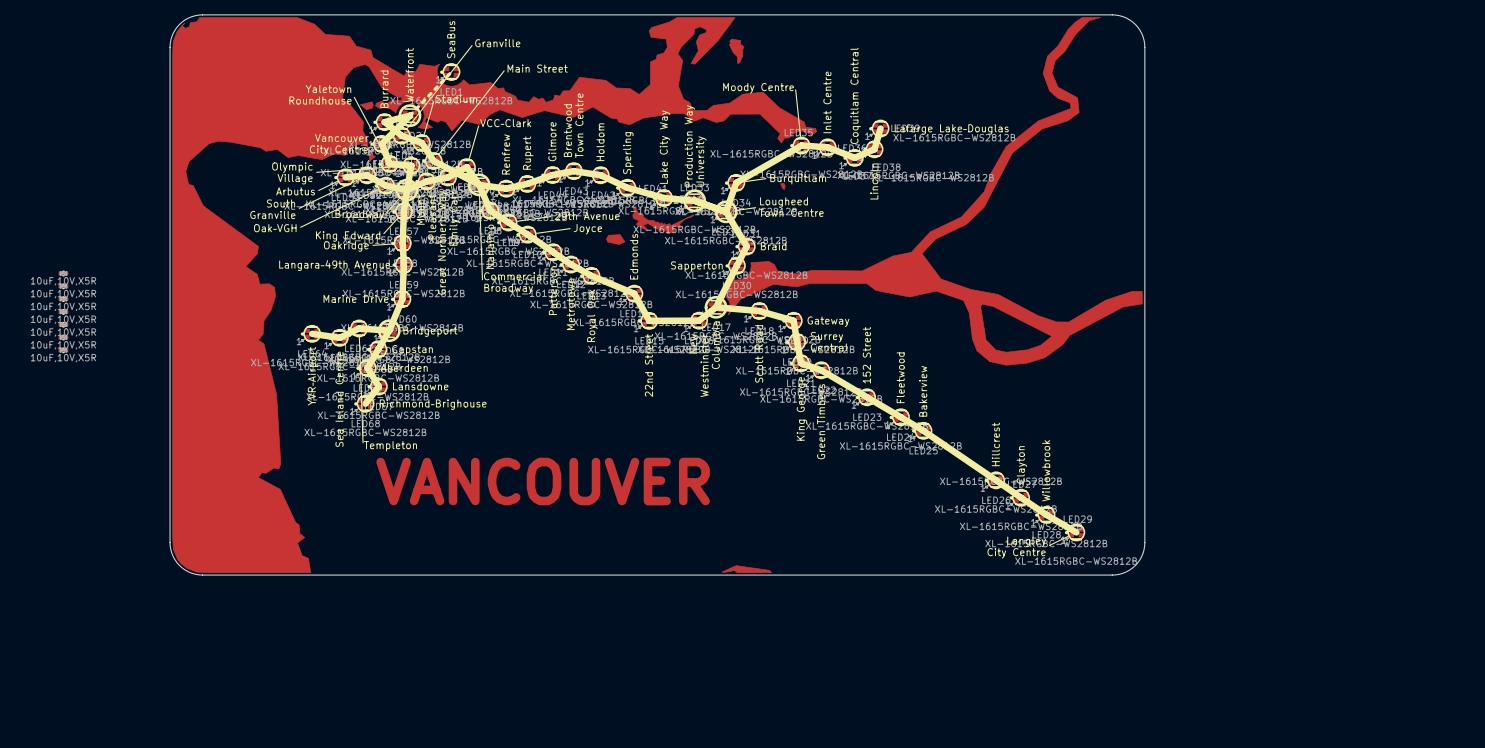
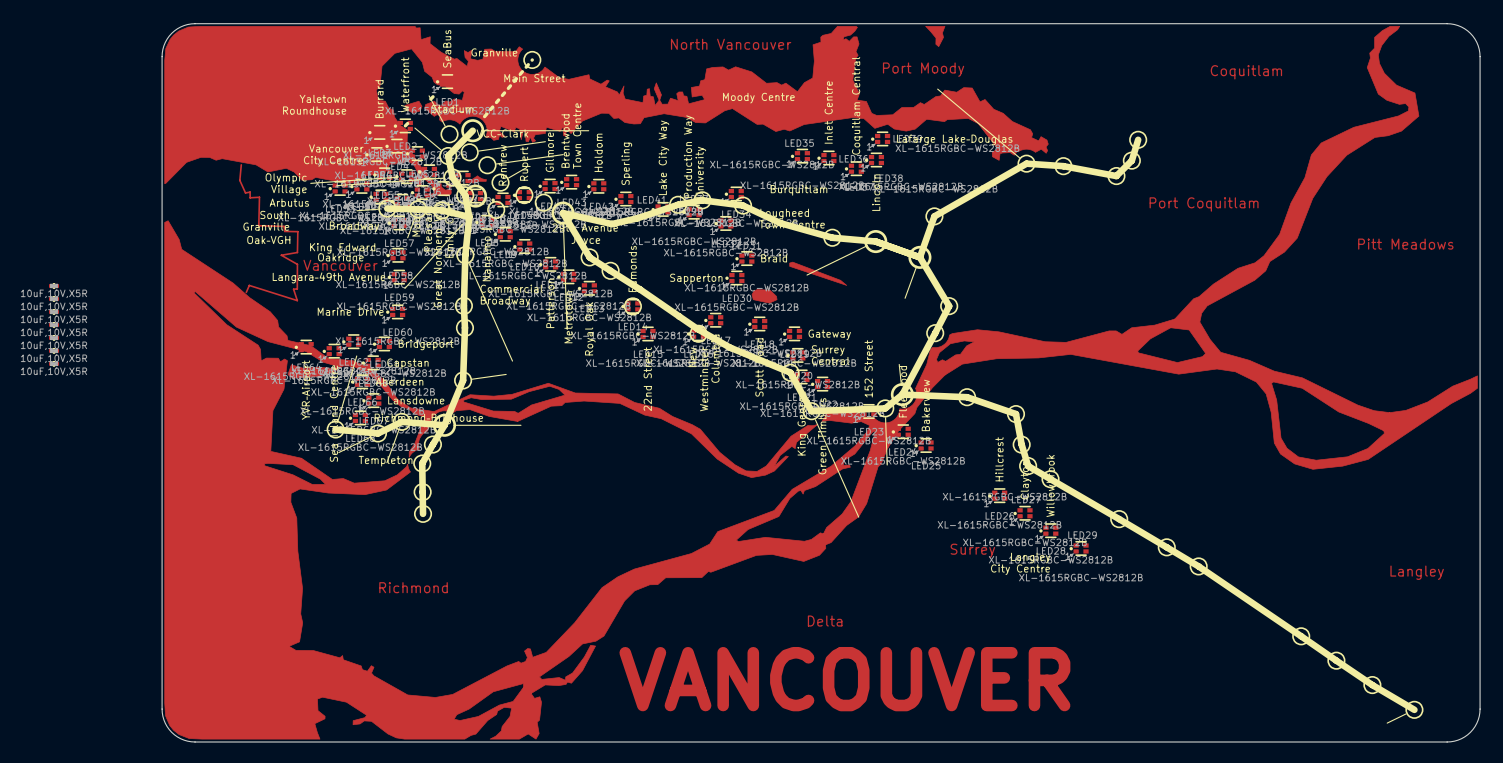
board edge: (1112, 14) (1126, 18) (1135, 24) (1143, 36) (1144, 47) (1144, 542) (1139, 559) (1129, 570) (1112, 575) (202, 575) (191, 573) (179, 565) (173, 556) (170, 542) -> (1117, 23) (1447, 23) (1464, 28) (1476, 42) (1480, 56) (1480, 709) (1476, 723) (1464, 736) (1447, 742) (191, 741) (180, 738) (171, 732) (165, 723) (162, 712) (162, 558)
drawing: [172, 17, 1143, 574] -> none
drawing: none -> [164, 26, 1073, 225]
text: none -> North Vancouver (731, 44)
line: (472, 45) (407, 128) -> none
line: none -> (532, 59) (532, 60)
line: none -> (528, 64) (526, 67)
text: none -> Port Moody (923, 69)
line: none -> (522, 71) (520, 74)
text: none -> Coquitlam (1246, 72)
line: none -> (516, 78) (514, 81)
line: (504, 70) (439, 153) -> none
line: (449, 73) (447, 76) -> none
line: none -> (510, 85) (508, 88)
line: none -> (937, 89) (1019, 157)
line: (443, 80) (441, 82) -> none
line: none -> (504, 92) (502, 95)
line: none -> (429, 95) (445, 126)
line: (795, 89) (800, 136) -> none
line: none -> (498, 99) (496, 102)
line: (430, 93) (428, 95) -> none
line: (354, 97) (385, 155) -> none
line: none -> (492, 107) (490, 109)
line: (424, 100) (422, 102) -> none
line: (433, 101) (424, 134) -> none
line: none -> (486, 114) (484, 116)
line: (418, 106) (416, 109) -> none
line: none -> (414, 128) (441, 150)
line: none -> (472, 130) (448, 156) (452, 177) (465, 195) (469, 216)
line: none -> (481, 130) (588, 130)
drawing: none -> [1107, 130, 1148, 186]
line: (478, 125) (469, 158) -> none
line: (880, 128) (874, 149) (854, 157) (827, 147) (801, 145) (736, 182) (726, 211) -> none
line: none -> (1138, 139) (1131, 160) (1116, 176) (1063, 166) (1026, 163) (934, 216) (919, 257)
line: none -> (545, 141) (478, 151)
line: none -> (563, 154) (496, 163)
track: none -> (241, 164) (239, 180) (245, 192) (250, 192) (250, 197) (259, 197) (258, 225) (284, 226) (284, 231) (297, 231) (297, 252) (281, 255) (297, 264) (297, 288) (293, 289) (297, 300) (249, 285) (246, 292)
line: none -> (526, 167) (508, 178)
line: none -> (443, 178) (336, 185)
line: (345, 177) (367, 175) (385, 185) (407, 190) -> none
line: (765, 178) (745, 181) -> none
line: (358, 179) (299, 208) -> none
line: (337, 181) (318, 190) -> none
drawing position: (736, 182) -> (743, 205)
line: (479, 184) (433, 161) (421, 142) (401, 135) (384, 122) (409, 115) (381, 143) (389, 163) (411, 165) (407, 190) -> none
line: (479, 184) (490, 210) (571, 264) (591, 275) (634, 293) (649, 320) (699, 320) (716, 307) -> none
line: (479, 184) (466, 167) (447, 177) (426, 181) (407, 190) -> none
line: (479, 184) (506, 188) (552, 175) (573, 171) (600, 175) (627, 187) (664, 198) (694, 200) (726, 211) -> none
line: (377, 189) (300, 227) -> none
line: (407, 190) (403, 211) (402, 299) (389, 330) -> none
line: (479, 193) (482, 279) -> none
text: none -> Port Coquitlam (1204, 204)
drawing: none -> [925, 207, 944, 226]
line: (400, 196) (386, 212) -> none
line: none -> (387, 208) (442, 210) (469, 216)
drawing position: (664, 198) -> (678, 204)
line: none -> (469, 216) (465, 255) (463, 380) (444, 425)
line: none -> (414, 217) (407, 237)
line: (755, 207) (735, 210) -> none
line: none -> (563, 222) (567, 329)
line: (726, 211) (746, 246) (716, 307) -> none
line: none -> (463, 223) (404, 288)
line: (550, 216) (517, 221) -> none
drawing: none -> [823, 228, 842, 247]
line: (397, 218) (383, 233) -> none
drawing: none -> [864, 230, 888, 254]
line: (570, 228) (536, 233) -> (506, 374) (472, 379)
text: none -> Pitt Meadows (1405, 244)
line: none -> (867, 245) (807, 275)
drawing: none -> [908, 245, 932, 269]
drawing: none -> [456, 246, 475, 265]
drawing: none -> [580, 248, 620, 280]
line: (393, 243) (372, 245) -> (378, 209) (357, 210)
line: none -> (919, 257) (949, 306) (902, 394)
line: none -> (919, 257) (875, 241) (832, 237) (780, 223) (743, 205) (702, 200) (678, 204) (637, 218) (611, 224) (563, 213) (589, 257) (697, 329) (729, 347) (790, 372) (811, 411) (885, 408) (902, 394)
drawing: none -> [789, 261, 848, 286]
line: none -> (469, 263) (512, 361)
text: none -> Vancouver (340, 265)
line: none -> (916, 266) (905, 298)
drawing: none -> [751, 289, 778, 304]
drawing: none -> [454, 296, 475, 337]
drawing: none -> [940, 297, 959, 316]
line: (716, 307) (759, 311) (793, 320) (801, 363) (821, 370) (923, 430) (1046, 514) (1076, 532) -> none
drawing: none -> [926, 324, 945, 343]
line: (389, 330) (359, 328) (339, 337) (312, 333) -> none
line: (389, 330) (367, 368) (378, 386) (365, 403) -> none
drawing position: (389, 330) -> (444, 425)
line: (359, 337) (363, 442) -> none
line: none -> (356, 355) (338, 420)
drawing: none -> [781, 363, 800, 382]
line: none -> (899, 364) (901, 385)
drawing: none -> [454, 371, 473, 390]
drawing shape: [812, 361, 831, 380] -> [164, 26, 1478, 740]
drawing: none -> [876, 383, 914, 418]
drawing: none -> [958, 388, 977, 407]
line: none -> (902, 394) (967, 397) (1016, 414) (1028, 466) (1198, 566) (1372, 685) (1414, 709)
drawing: none -> [802, 402, 821, 421]
drawing: [858, 388, 877, 407] -> none
drawing: none -> [1006, 405, 1026, 424]
drawing: none -> [368, 412, 411, 443]
line: none -> (885, 417) (887, 465)
line: none -> (815, 419) (858, 517)
drawing: none -> [326, 420, 345, 439]
drawing: [892, 408, 933, 440] -> none
line: none -> (444, 425) (401, 421) (377, 433) (335, 429)
line: none -> (444, 425) (422, 463) (423, 513)
line: none -> (453, 425) (520, 425)
line: none -> (398, 430) (386, 462)
drawing: none -> [413, 435, 442, 473]
drawing: none -> [1012, 435, 1060, 489]
line: none -> (369, 437) (338, 452)
drawing: none -> [413, 483, 433, 523]
drawing: [987, 471, 1056, 524] -> none
text: VANCOUVER (543, 481) -> none
drawing: none -> [1110, 510, 1129, 529]
drawing: none -> [1157, 538, 1176, 557]
drawing: [1067, 523, 1086, 542] -> none
text: none -> Surrey (972, 550)
line: (1068, 536) (1049, 545) -> none
drawing: none -> [1189, 557, 1208, 576]
text: none -> Langley (1417, 572)
text: none -> Richmond (413, 587)
text: none -> Delta (825, 621)
drawing: none -> [1292, 627, 1311, 646]
drawing: none -> [1327, 651, 1346, 670]
drawing: none -> [1363, 676, 1382, 695]
text: none -> VANCOUVER (844, 679)
drawing: none -> [1405, 700, 1424, 719]
line: none -> (1406, 713) (1387, 723)

